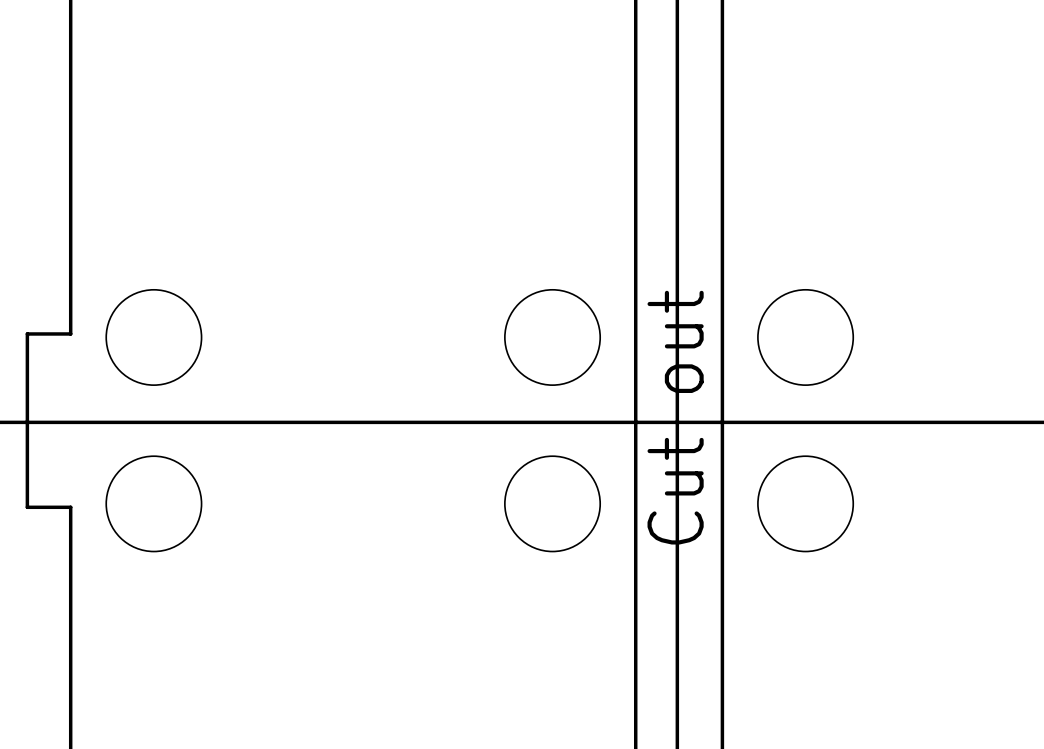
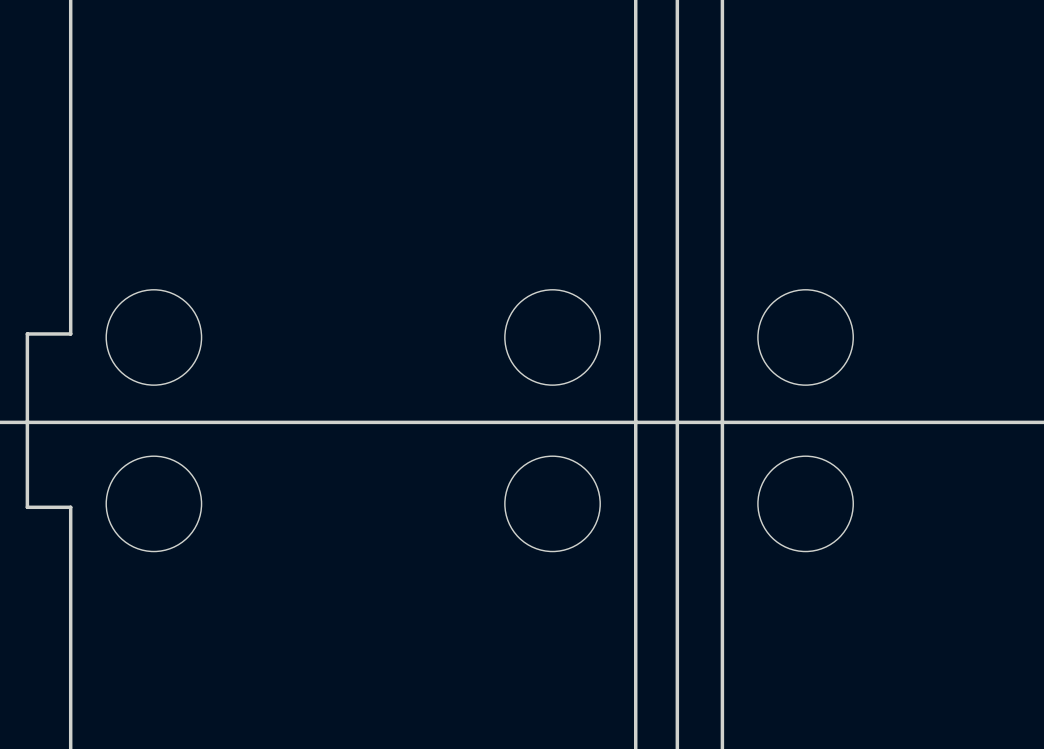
text: Cut out (675, 417) -> none

